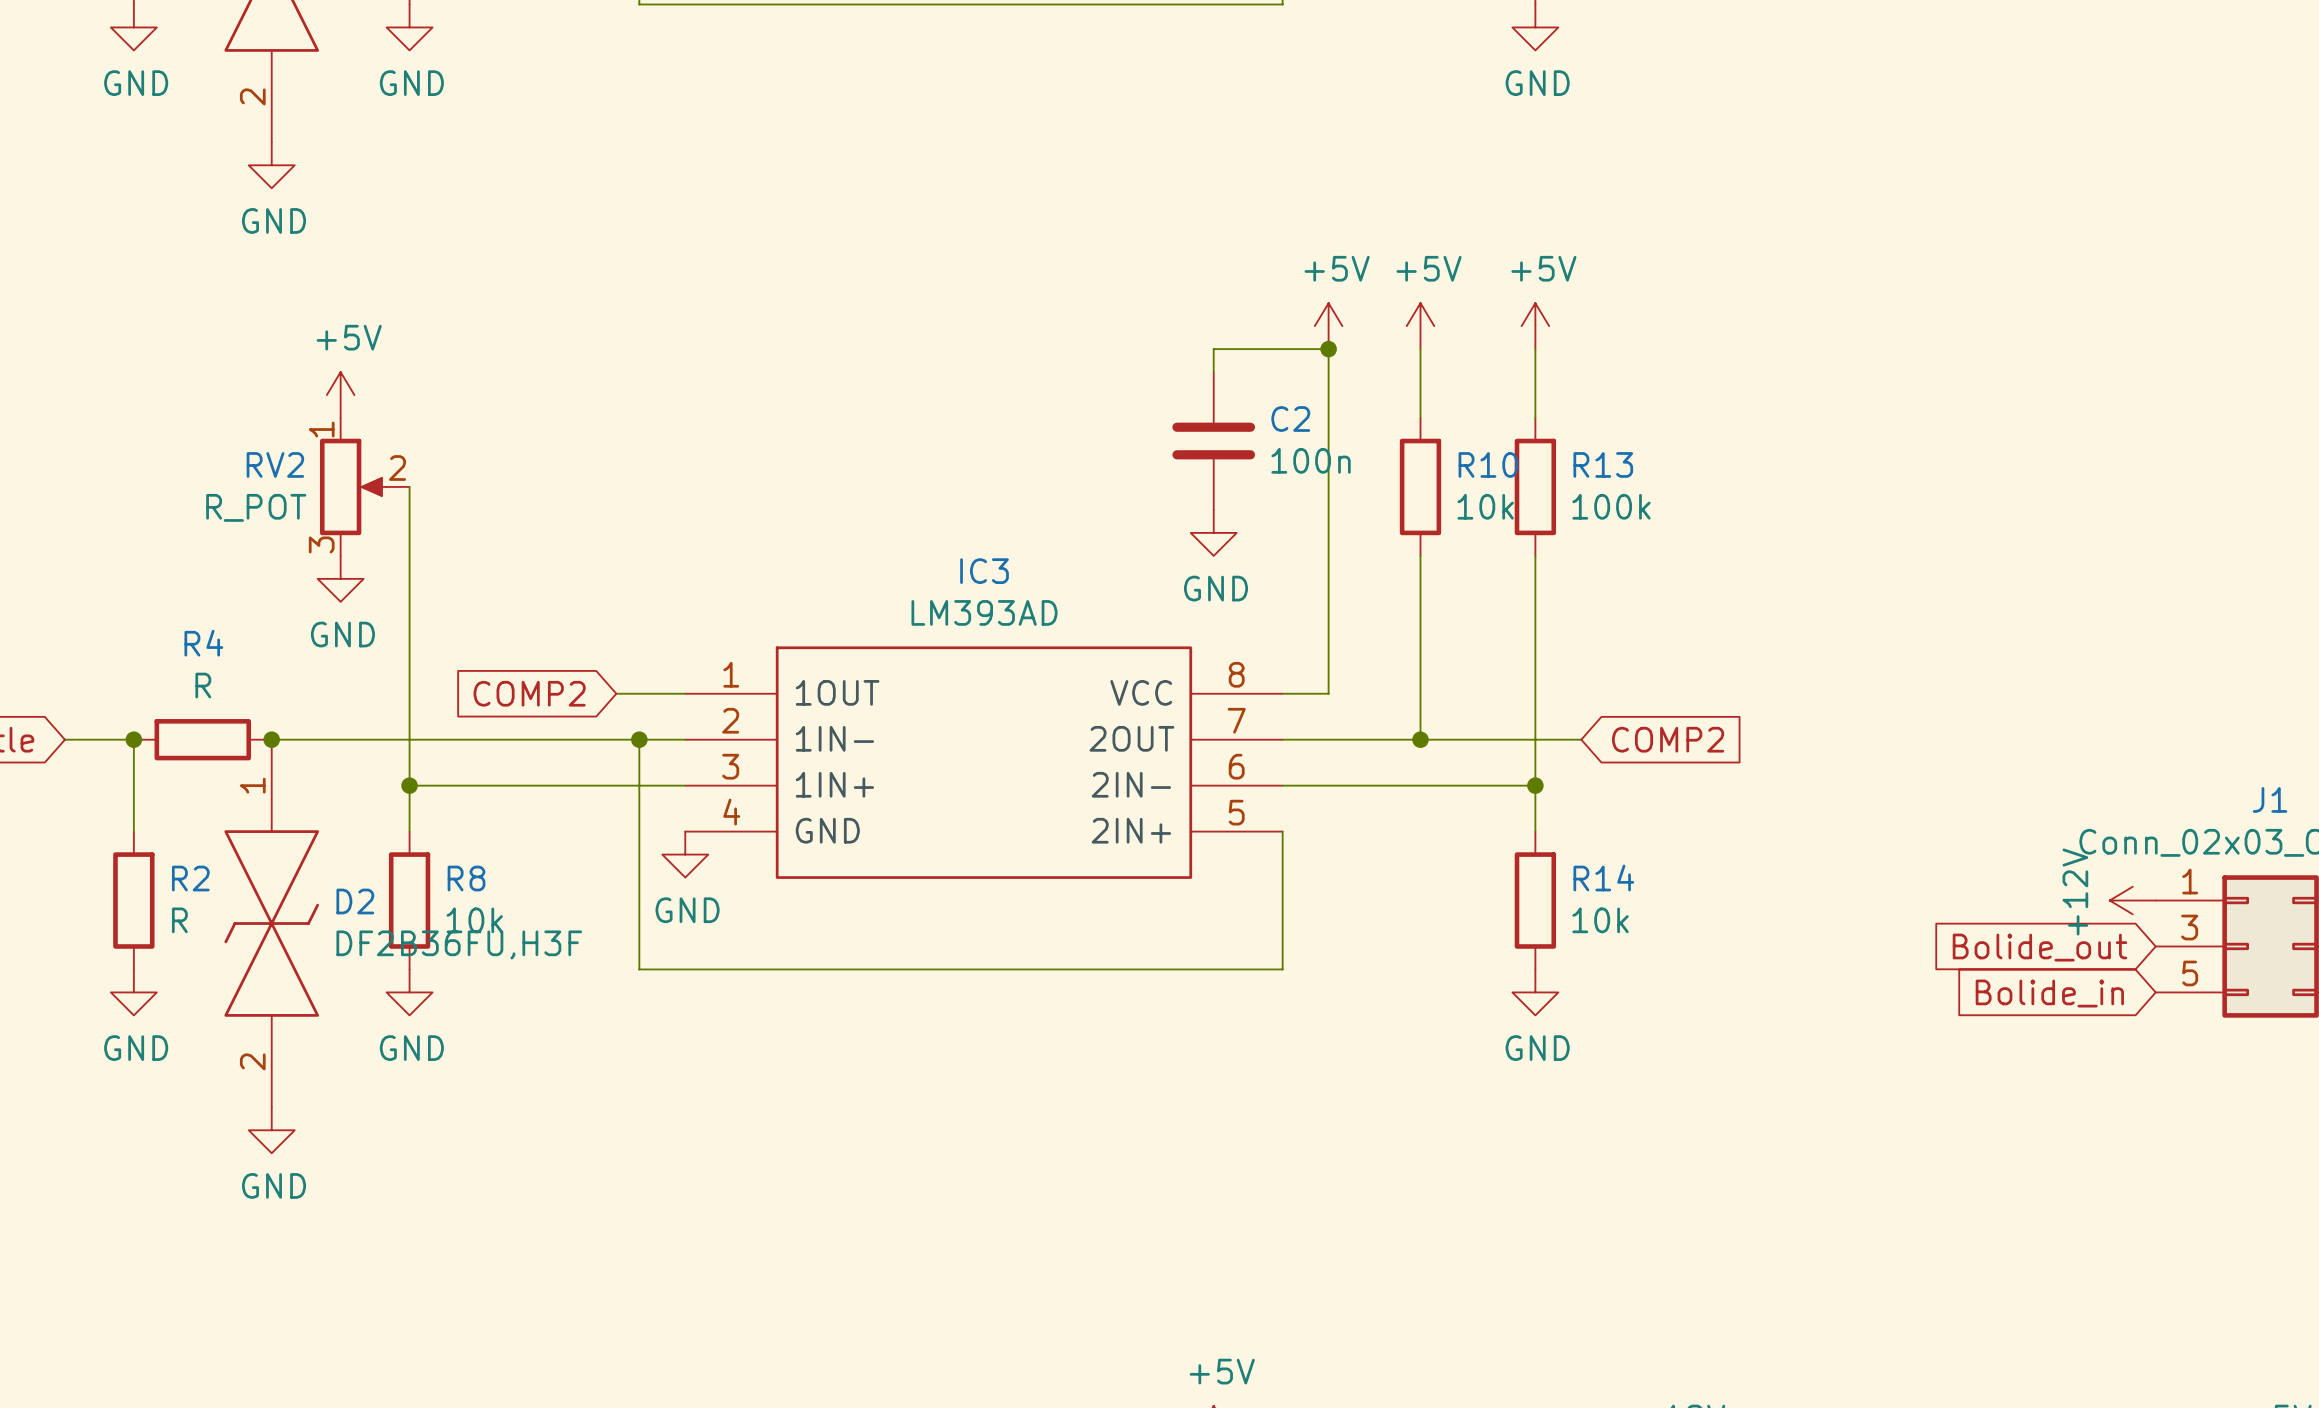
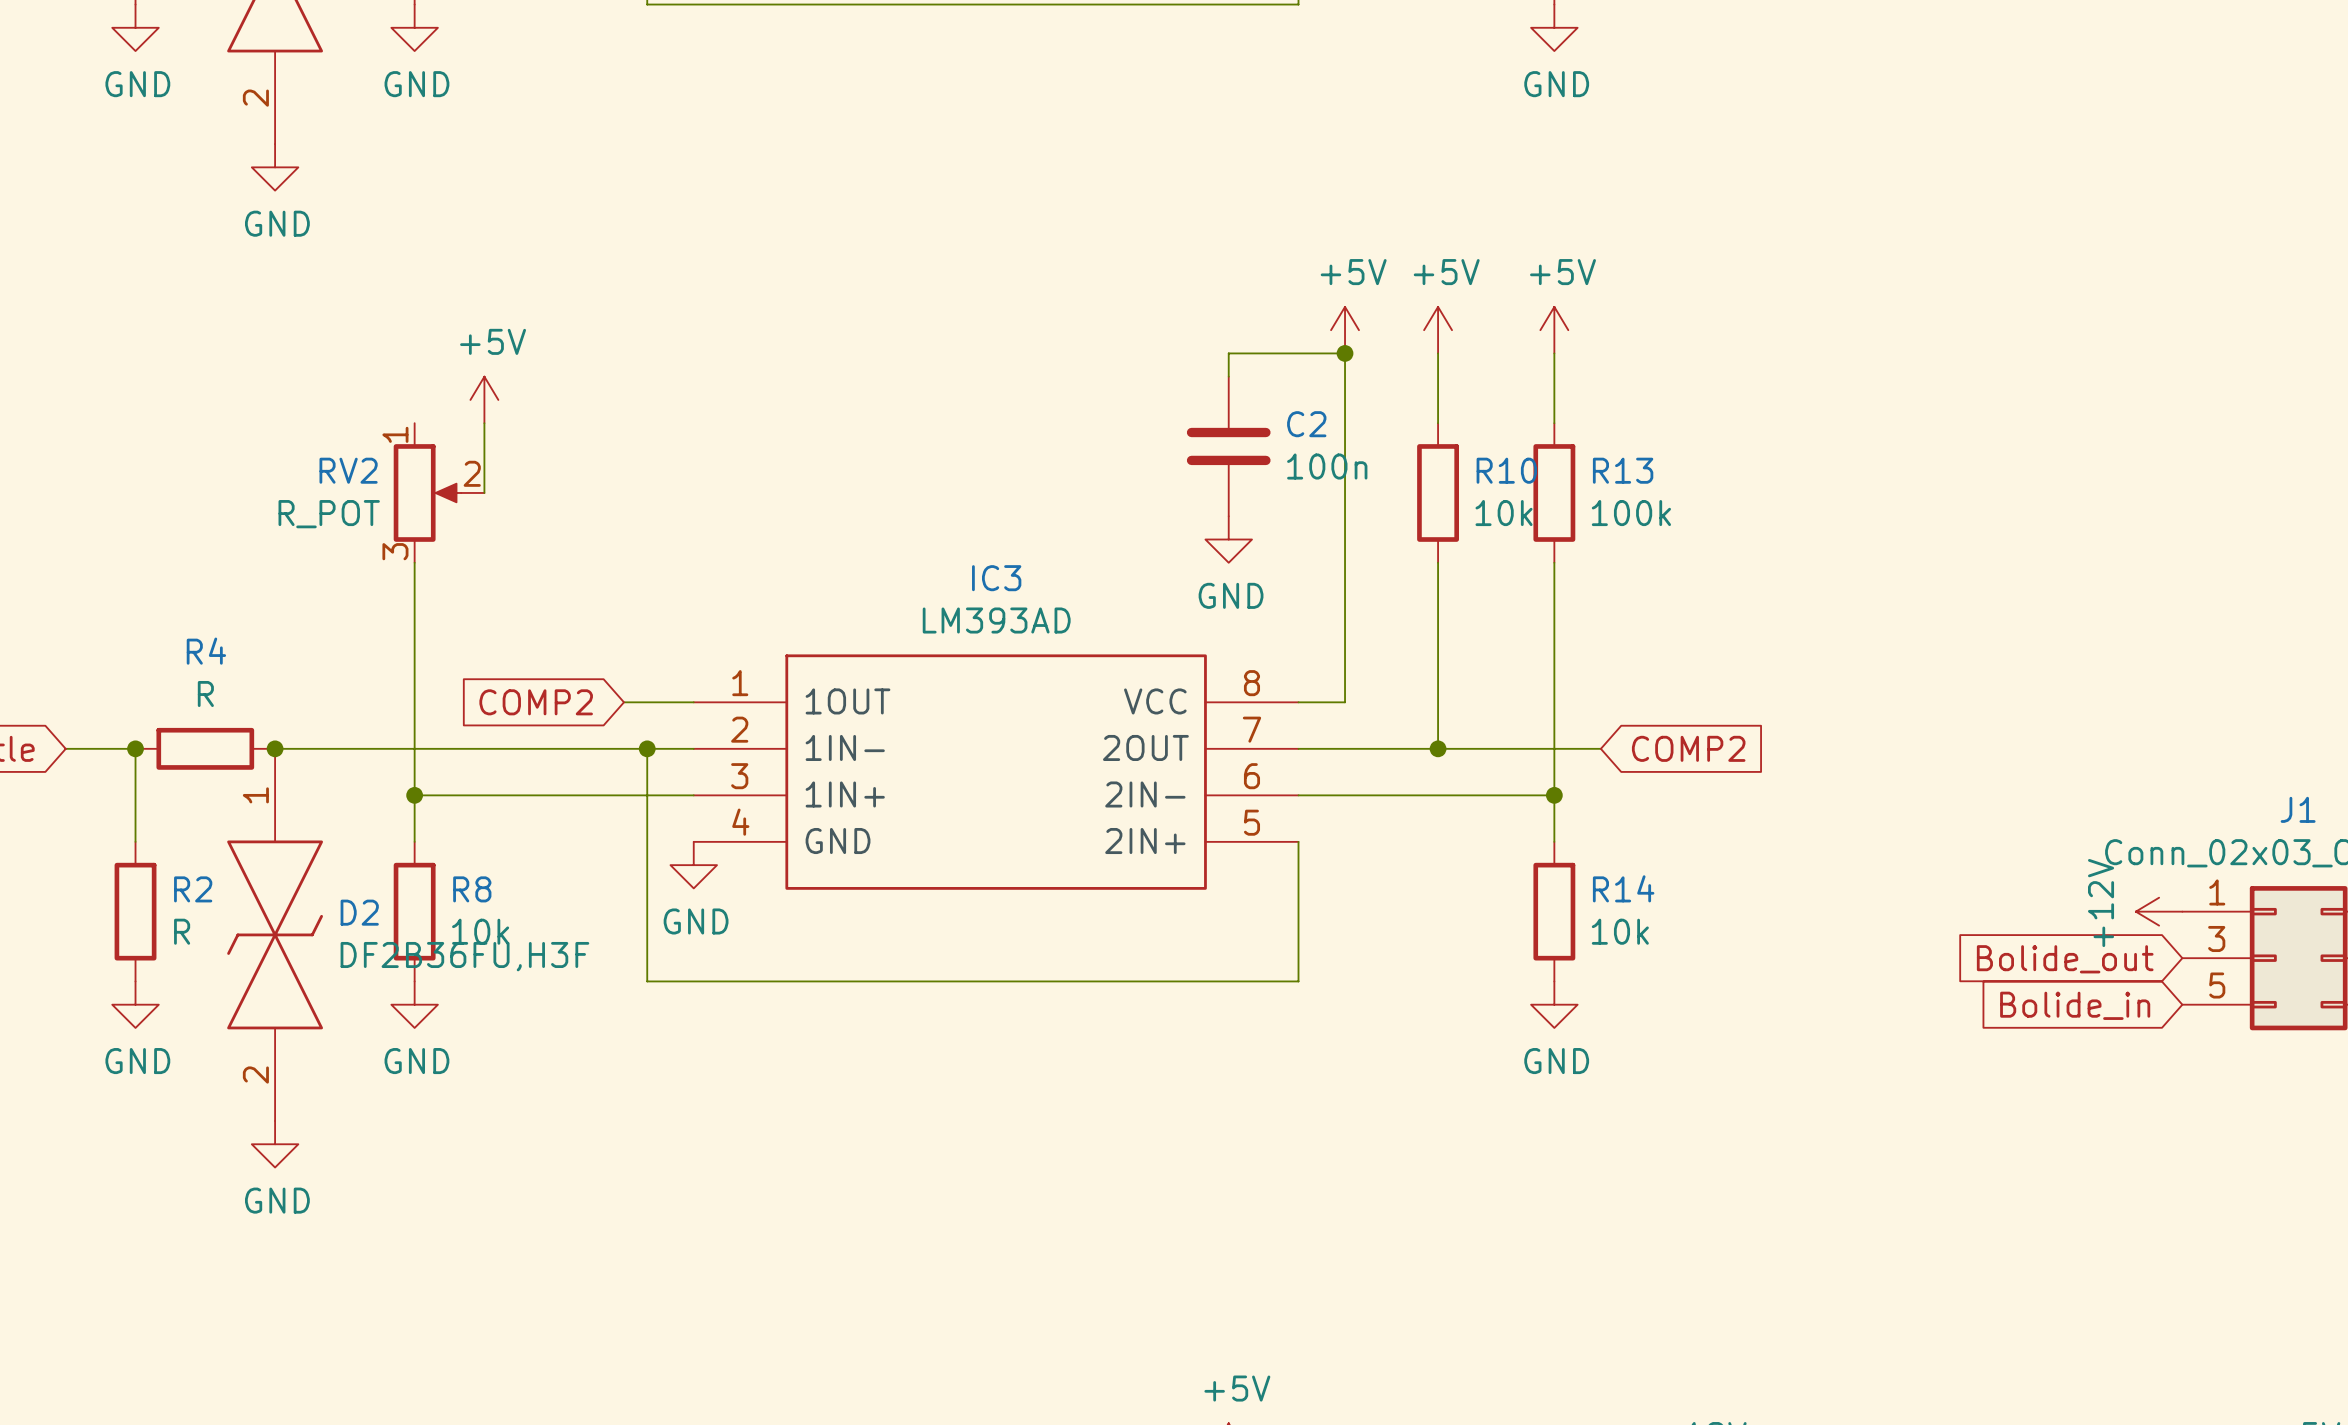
power symbol position: +5V (340, 395) -> +5V (484, 399)
RV2 position: (364, 486) -> (439, 492)
wire: (409, 486) (409, 555) -> (484, 423) (484, 492)
power symbol: GND (340, 578) -> none

